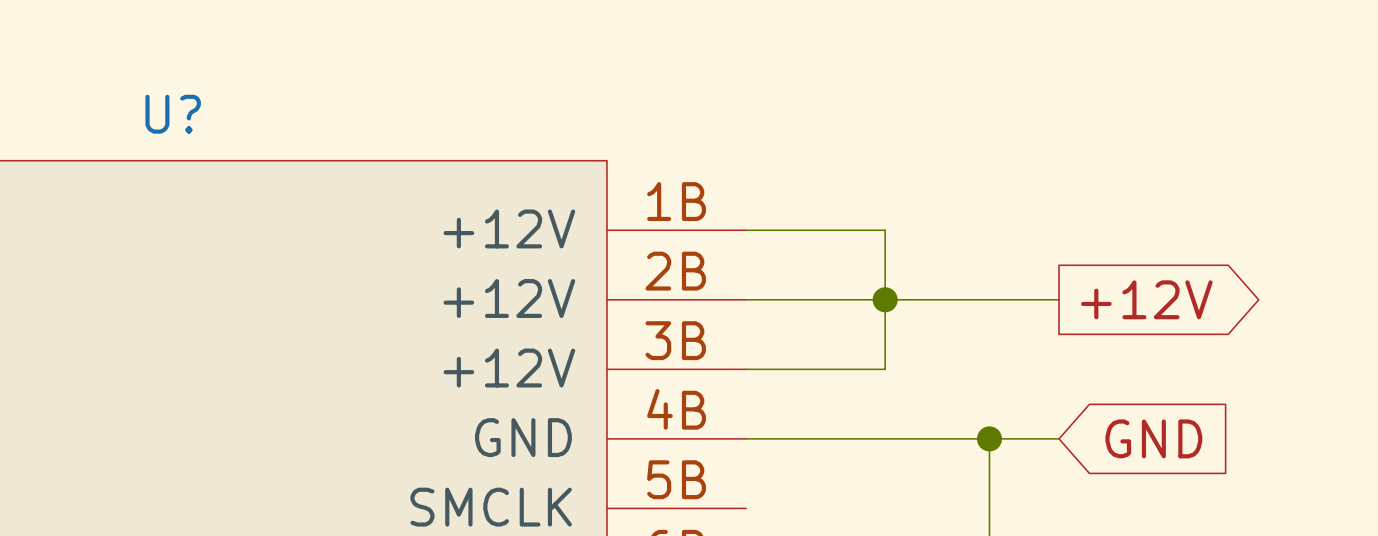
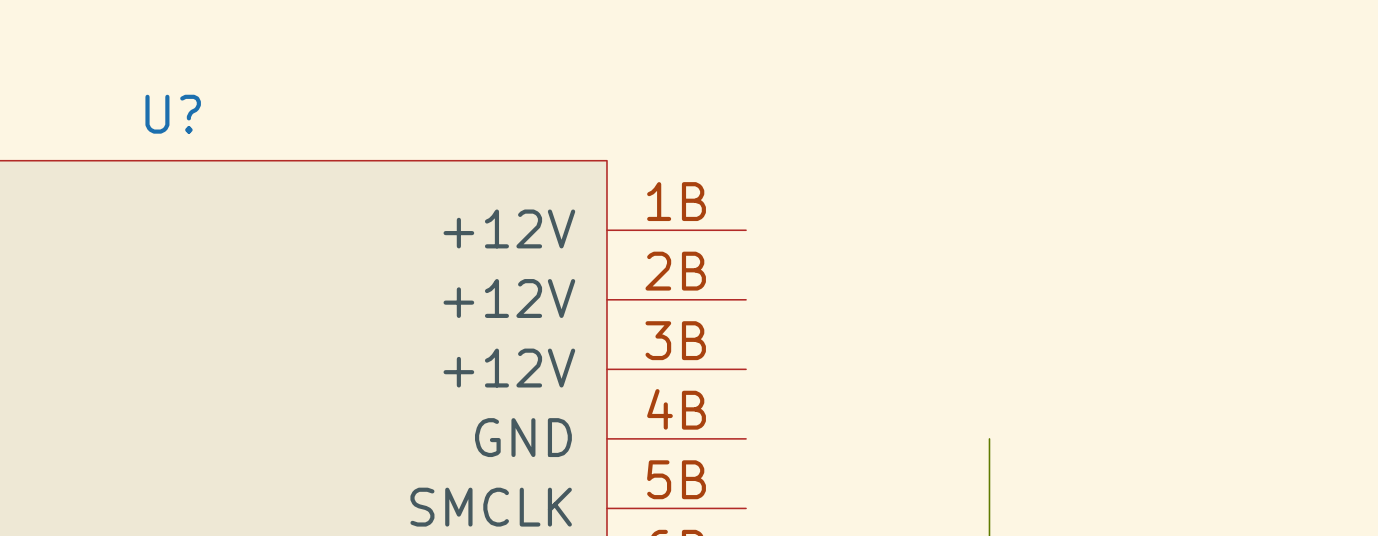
wire: (746, 230) (885, 230) (885, 369) (746, 369) -> none
wire: (746, 299) (1059, 299) -> none
junction: (885, 299) -> none
global label: +12V (1146, 299) -> none
wire: (746, 438) (1059, 438) -> none
junction: (989, 438) -> none
global label: GND (1153, 438) -> none

